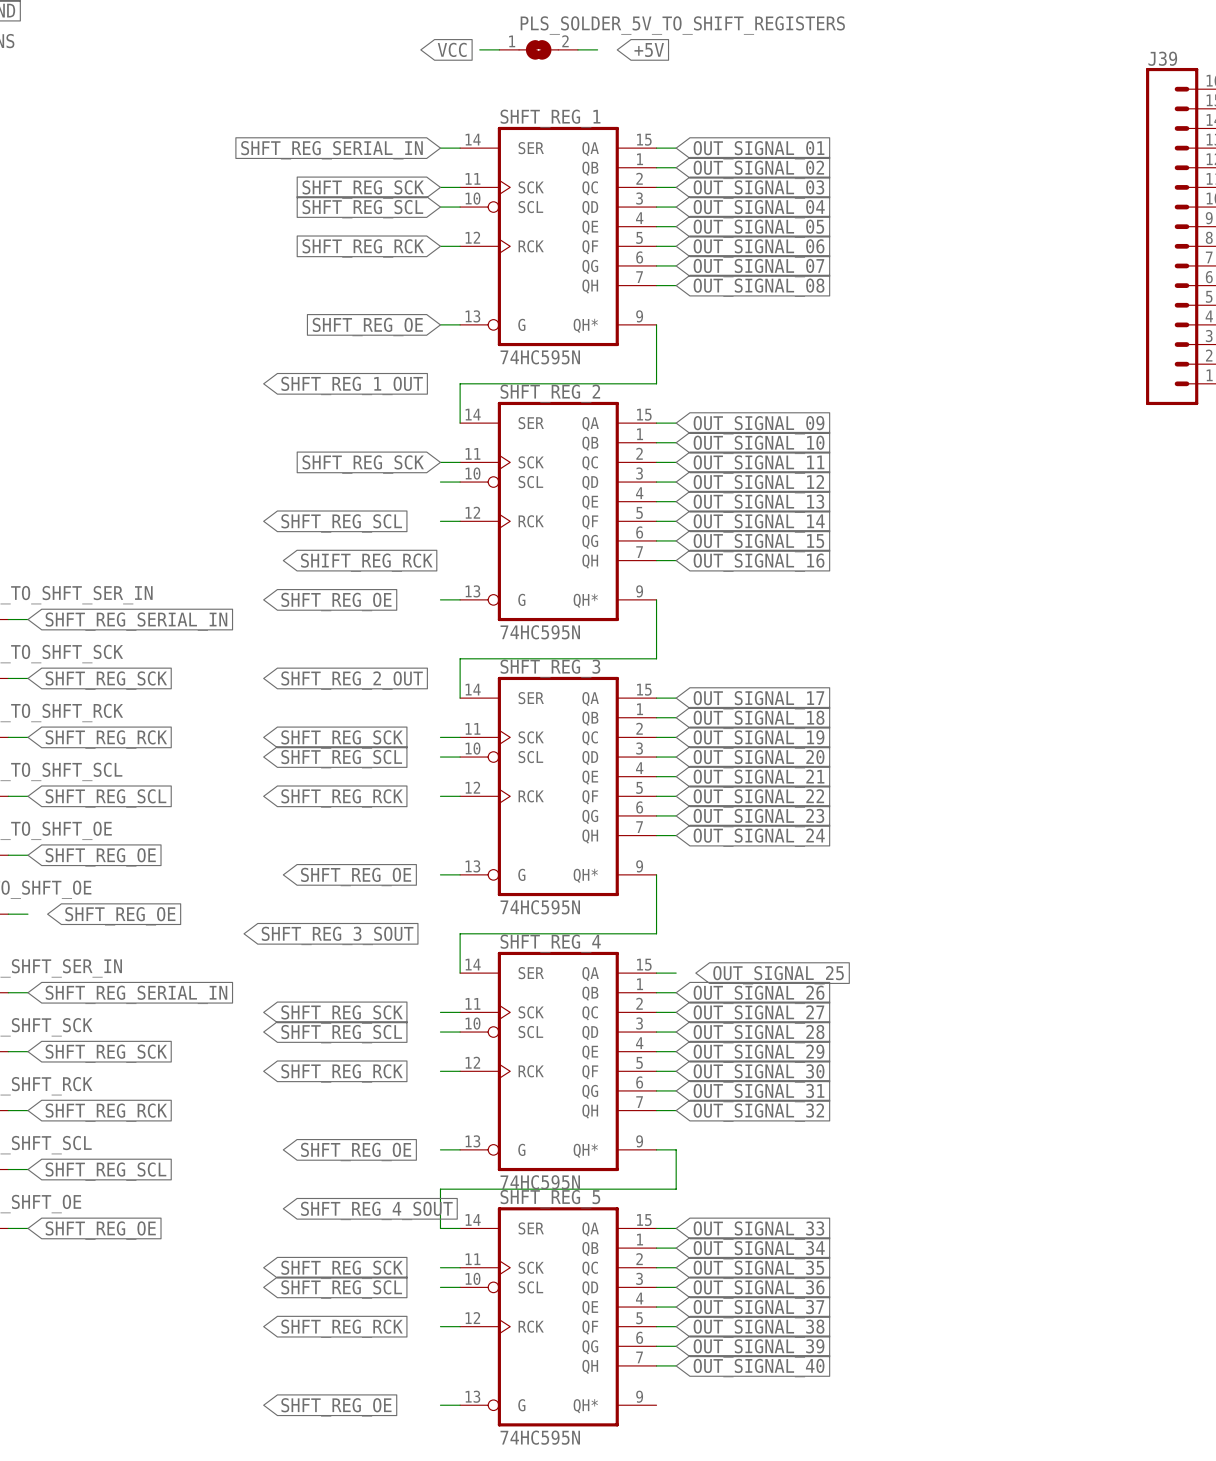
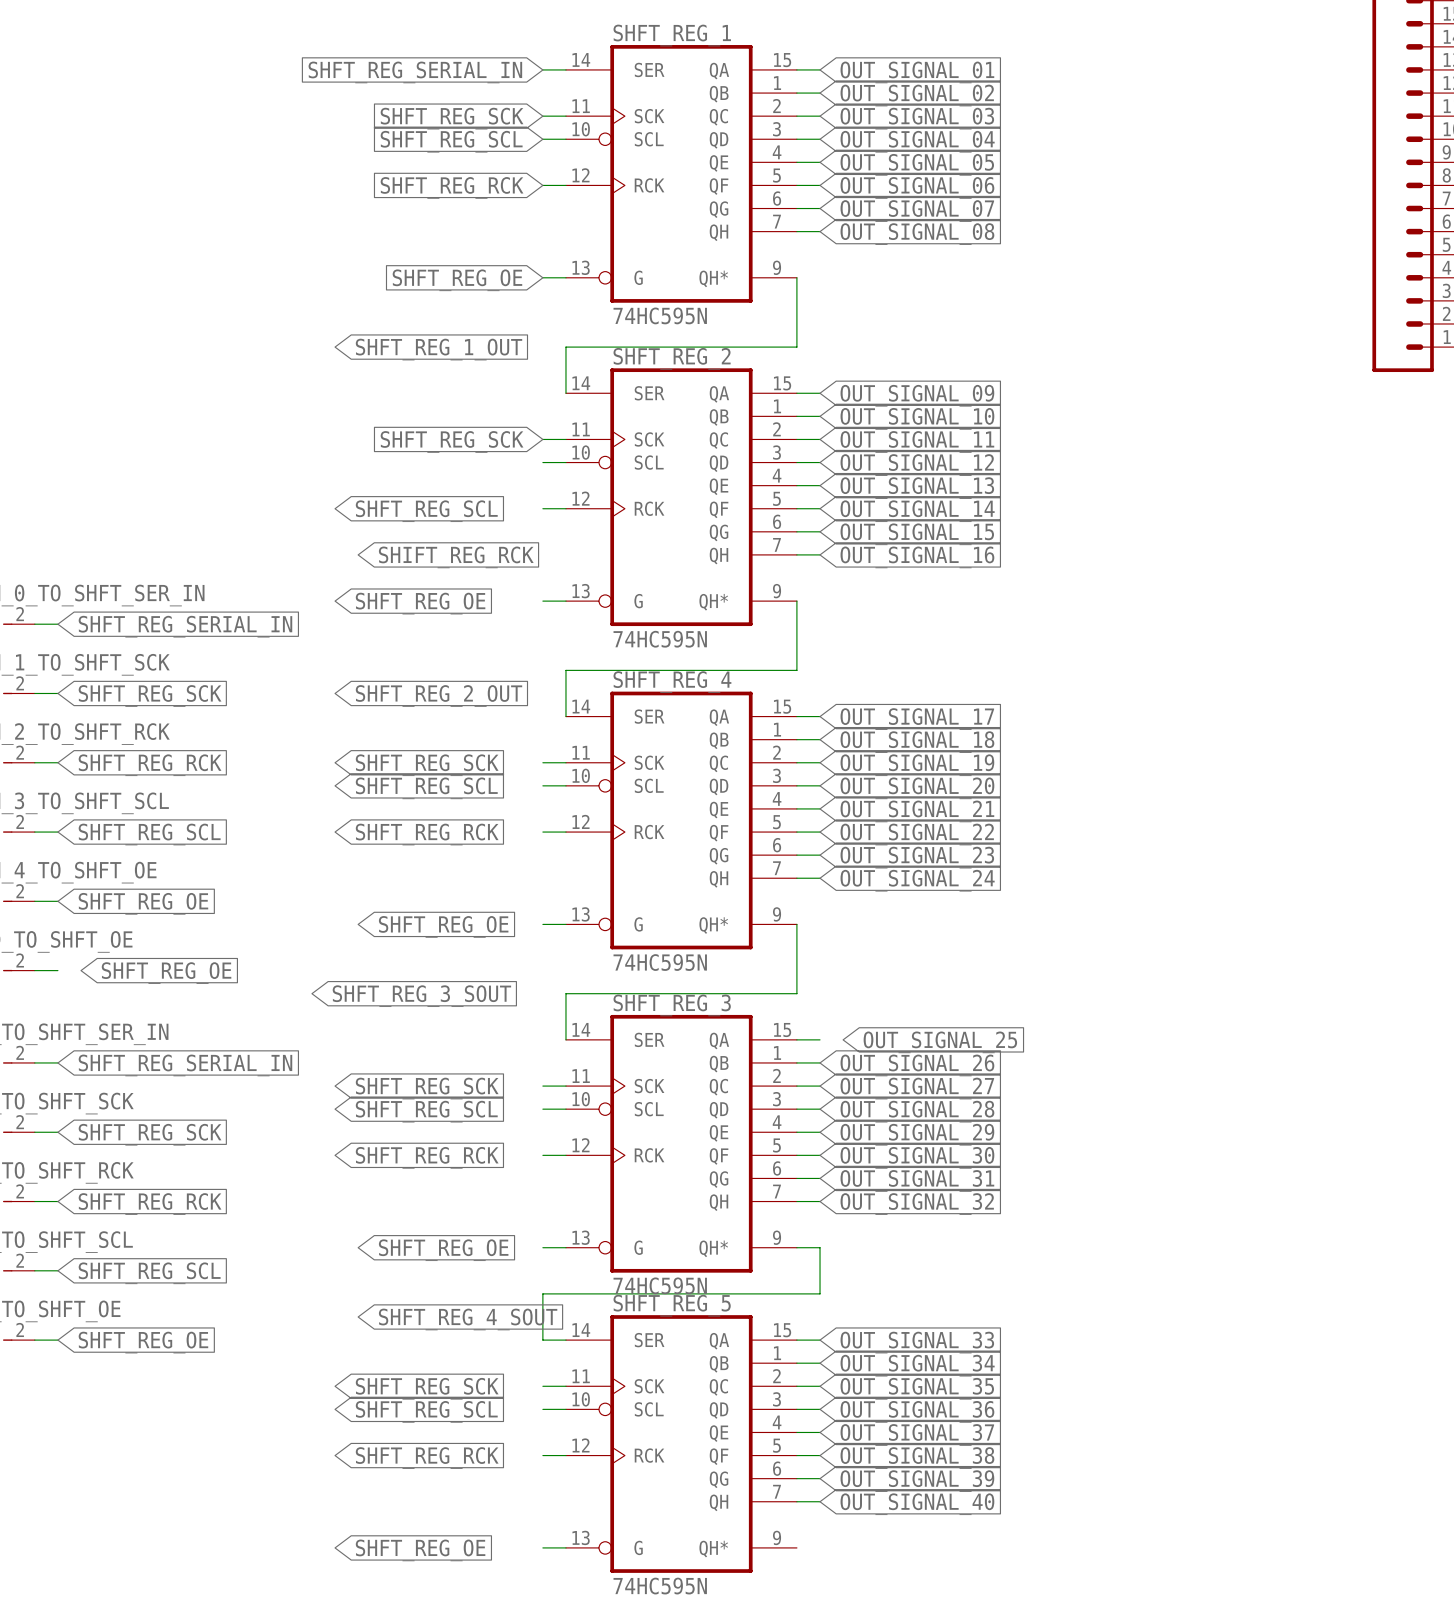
SHFT_REG_3 name: SHFT_REG_3 (550, 668) -> SHFT_REG_4 (672, 682)
SHFT_REG_4 name: SHFT_REG_4 (550, 943) -> SHFT_REG_3 (672, 1005)

